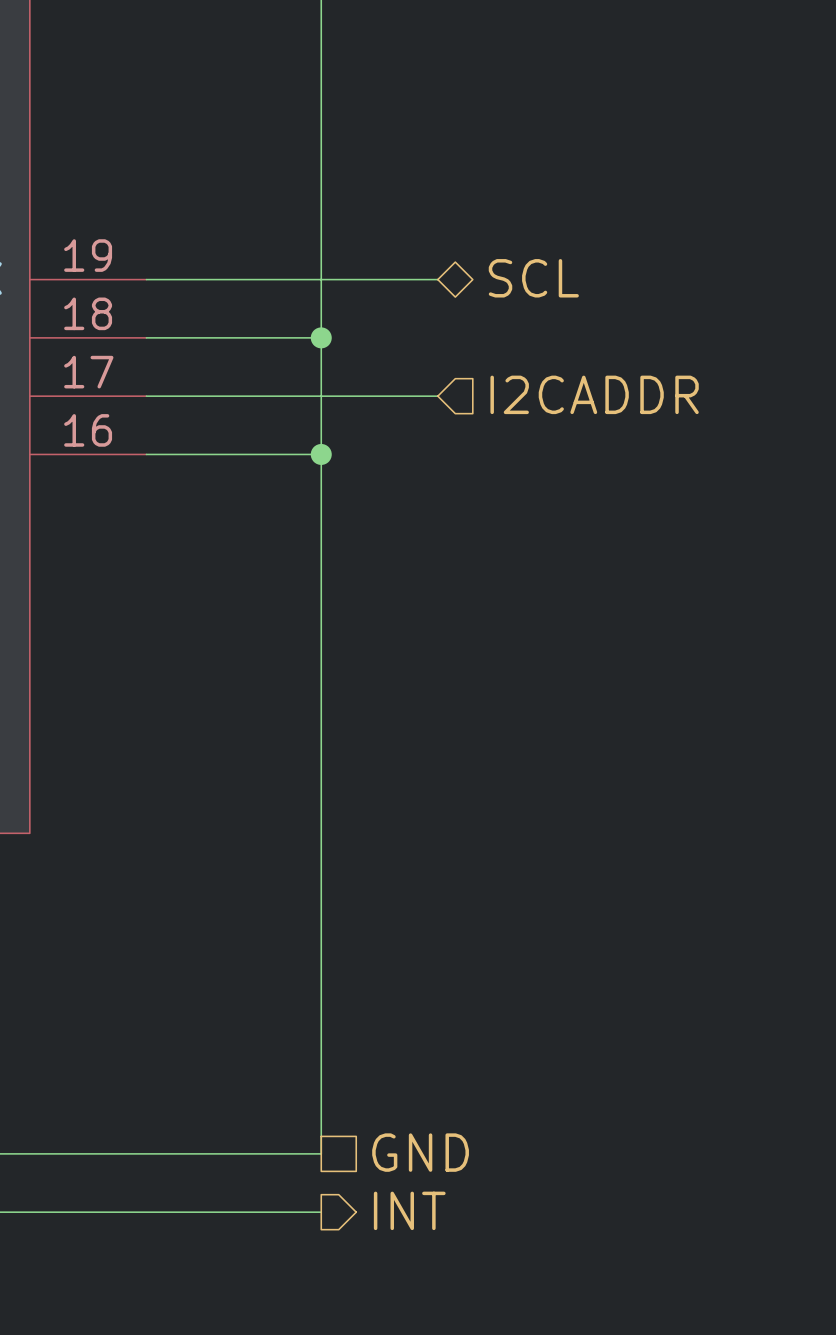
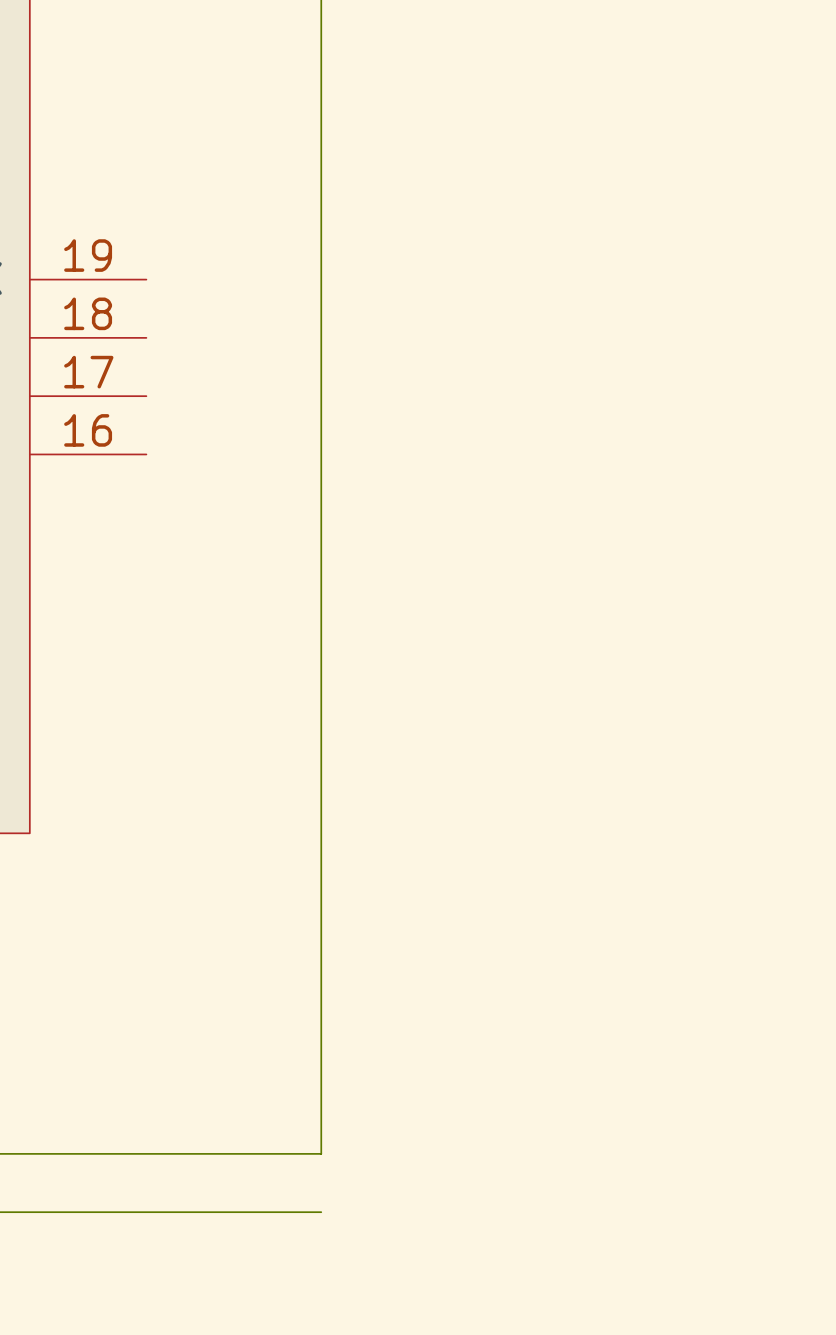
hierarchical label: SCL (533, 278) -> none
wire: (146, 279) (437, 279) -> none
wire: (146, 337) (321, 337) -> none
junction: (321, 337) -> none
hierarchical label: I2CADDR (594, 394) -> none
wire: (146, 396) (437, 396) -> none
wire: (146, 454) (321, 454) -> none
junction: (321, 454) -> none
hierarchical label: GND (420, 1152) -> none
hierarchical label: INT (409, 1210) -> none

